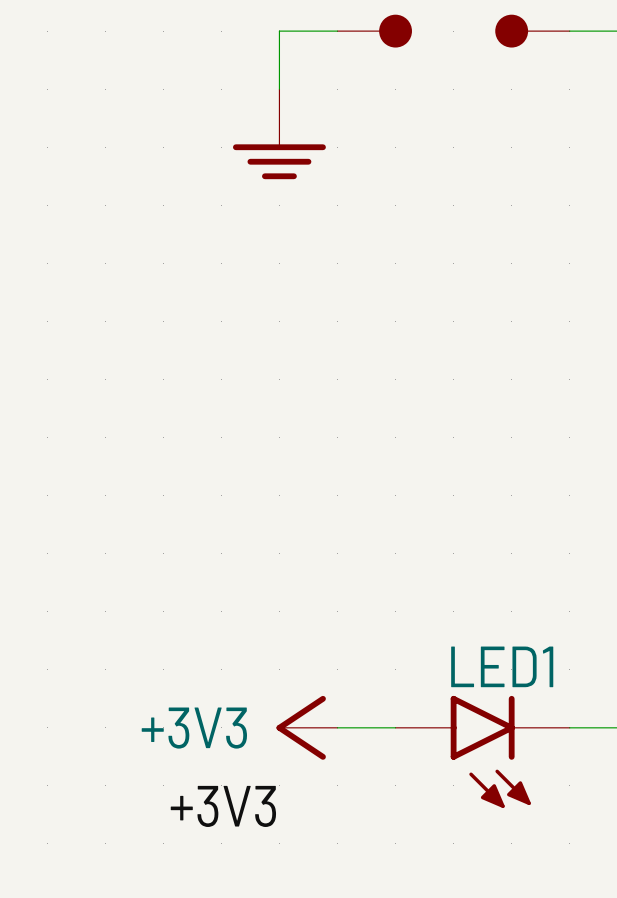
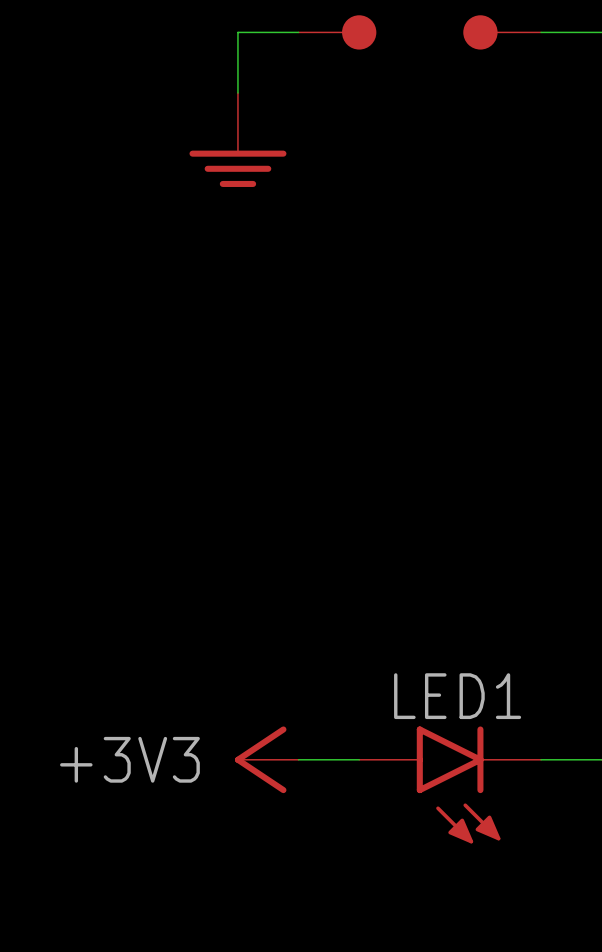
label: +3V3 (223, 806) -> none

